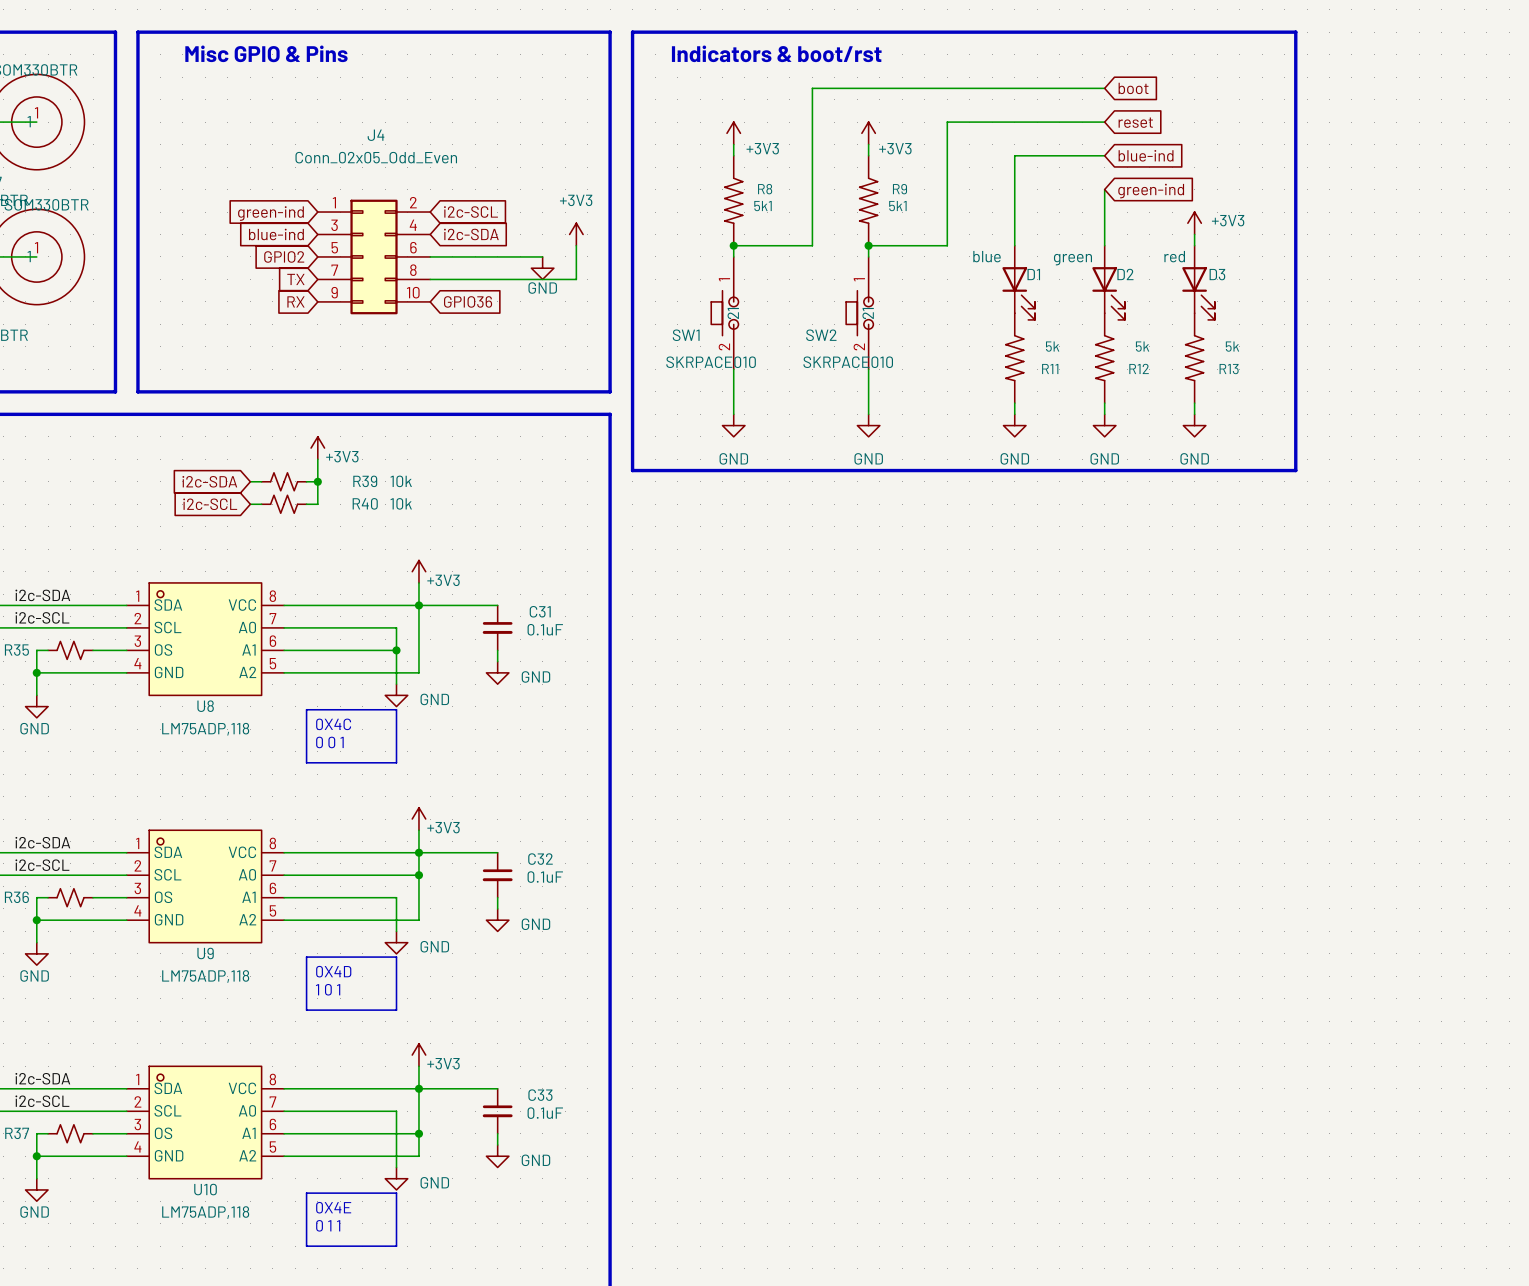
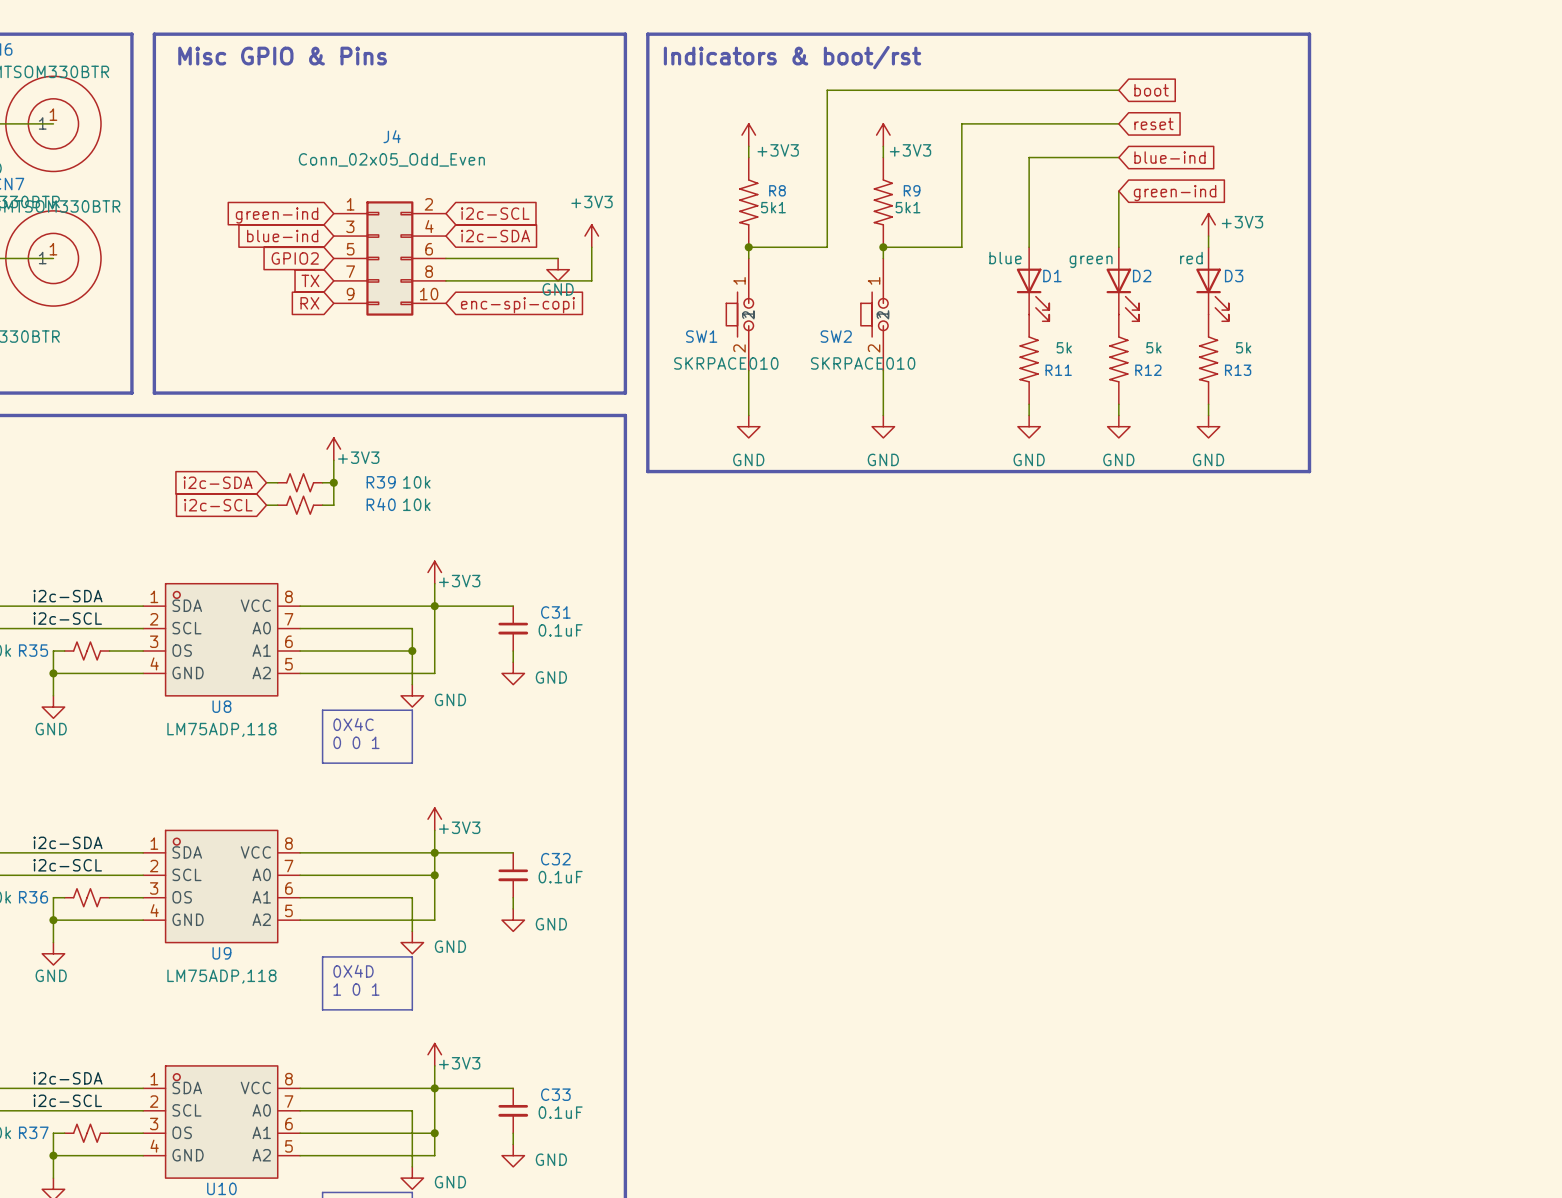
global label: GPIO36 (468, 301) -> enc-spi-copi (517, 305)

